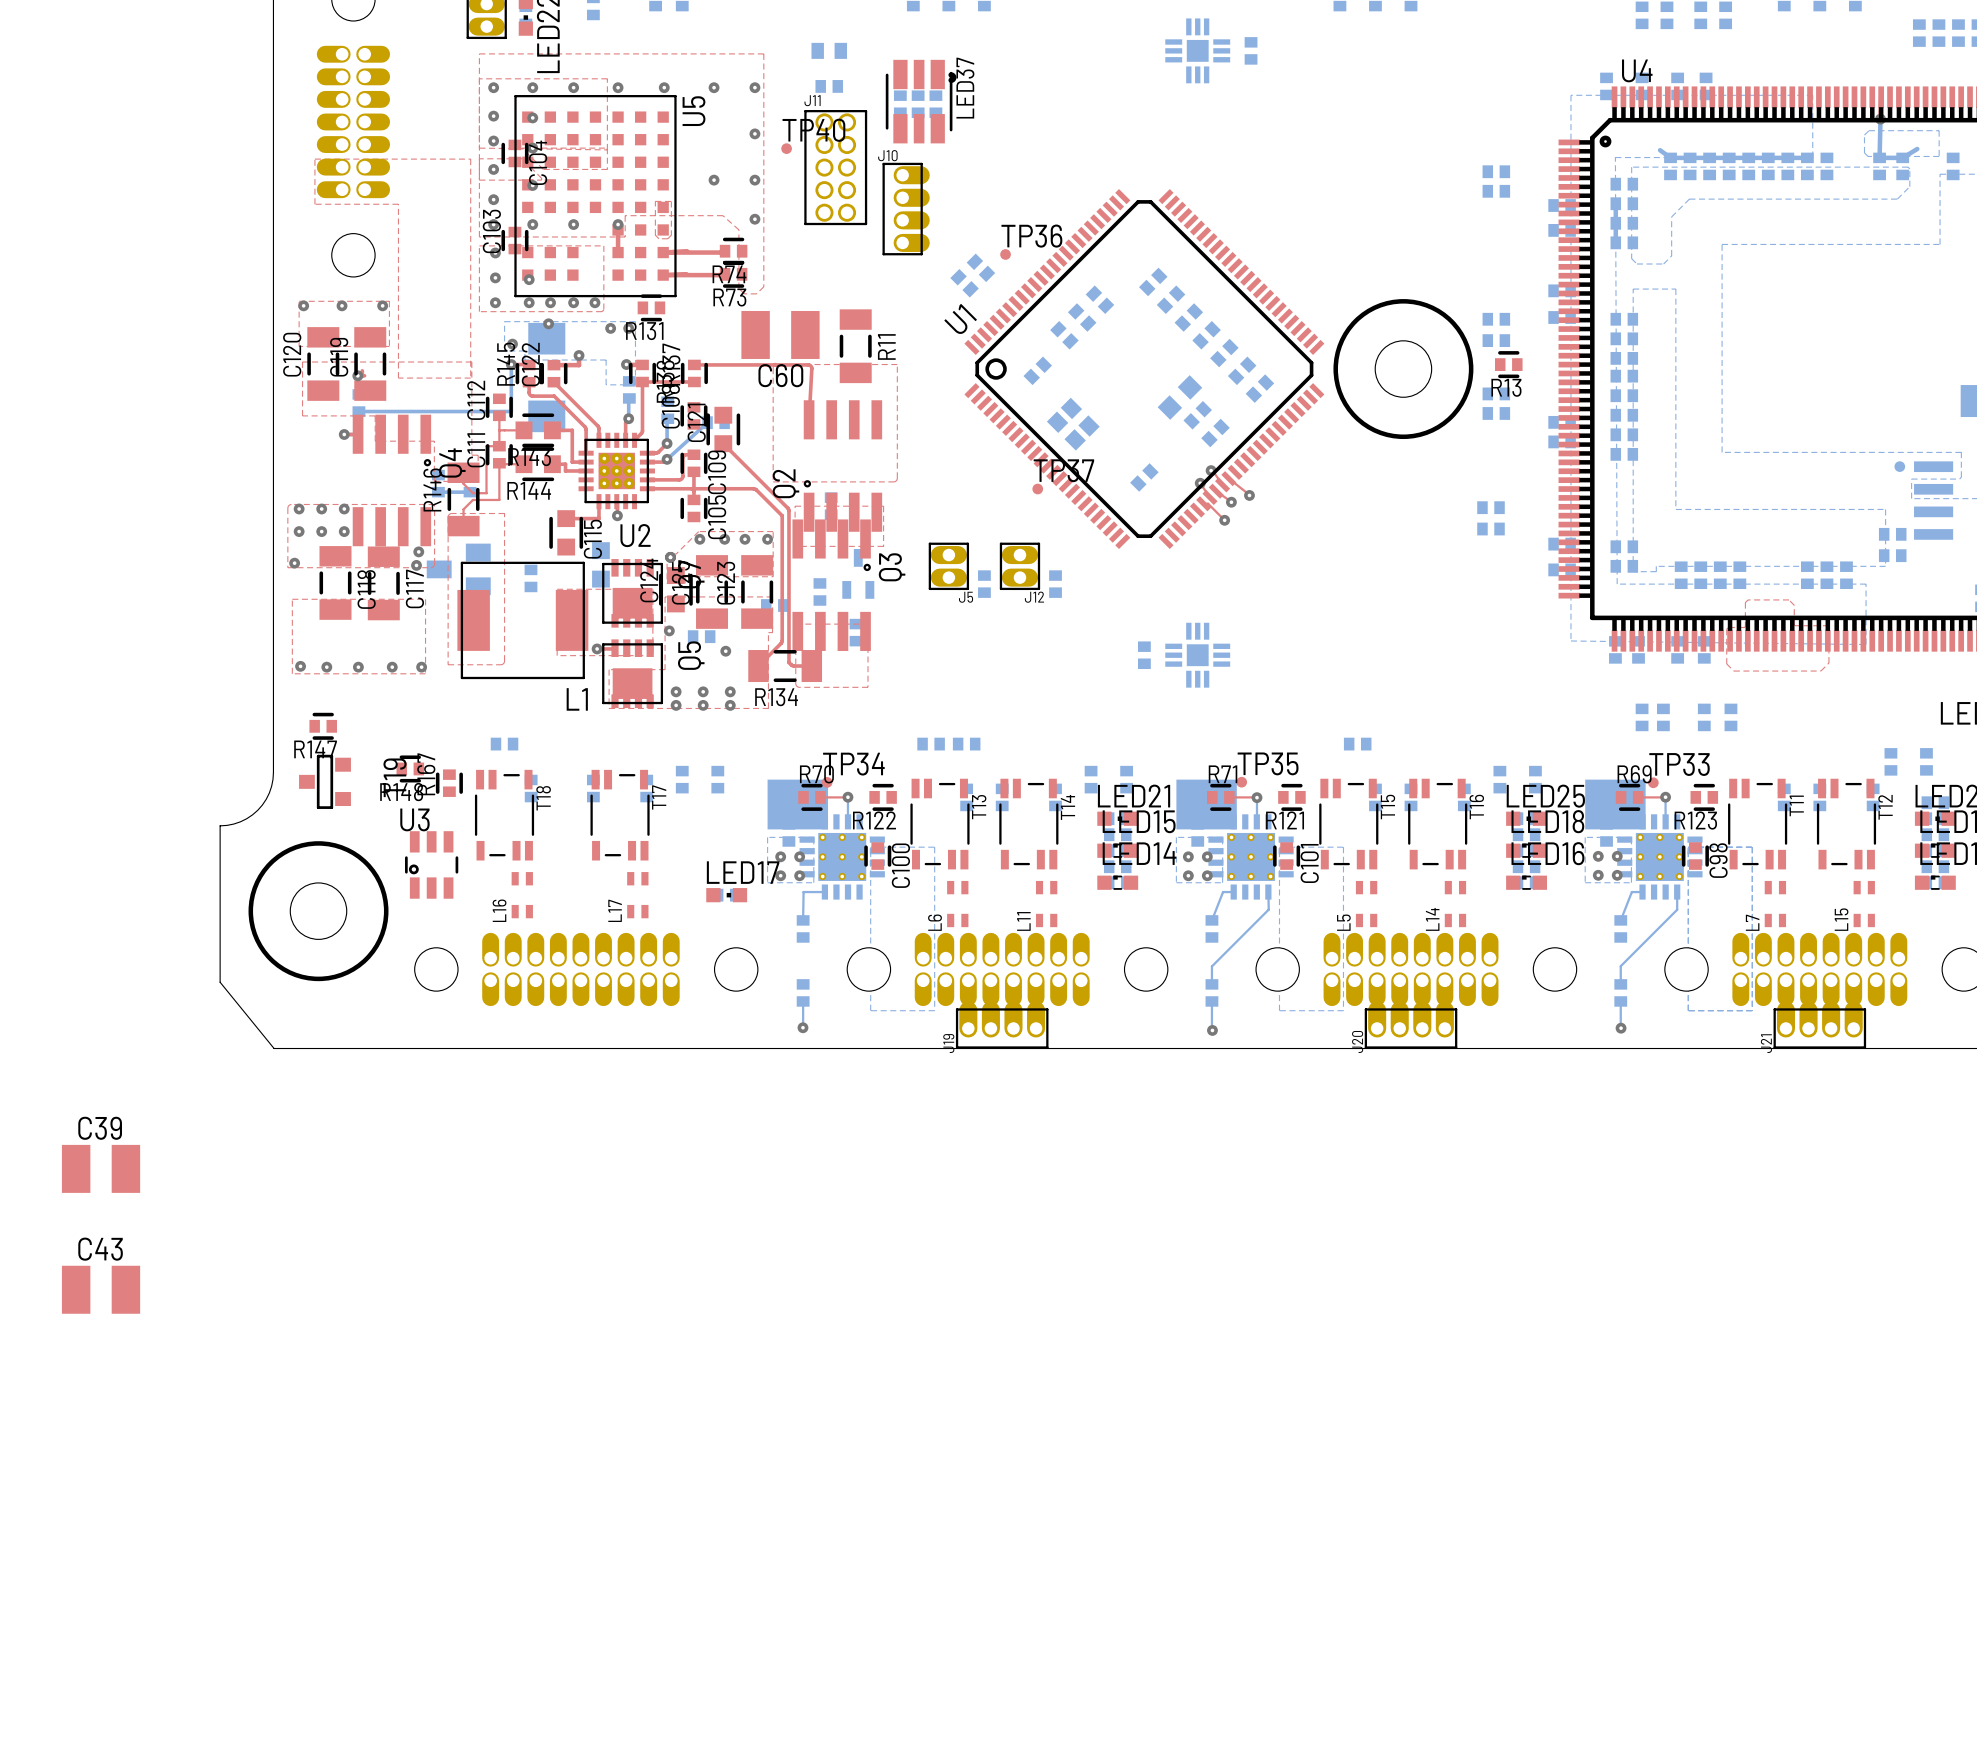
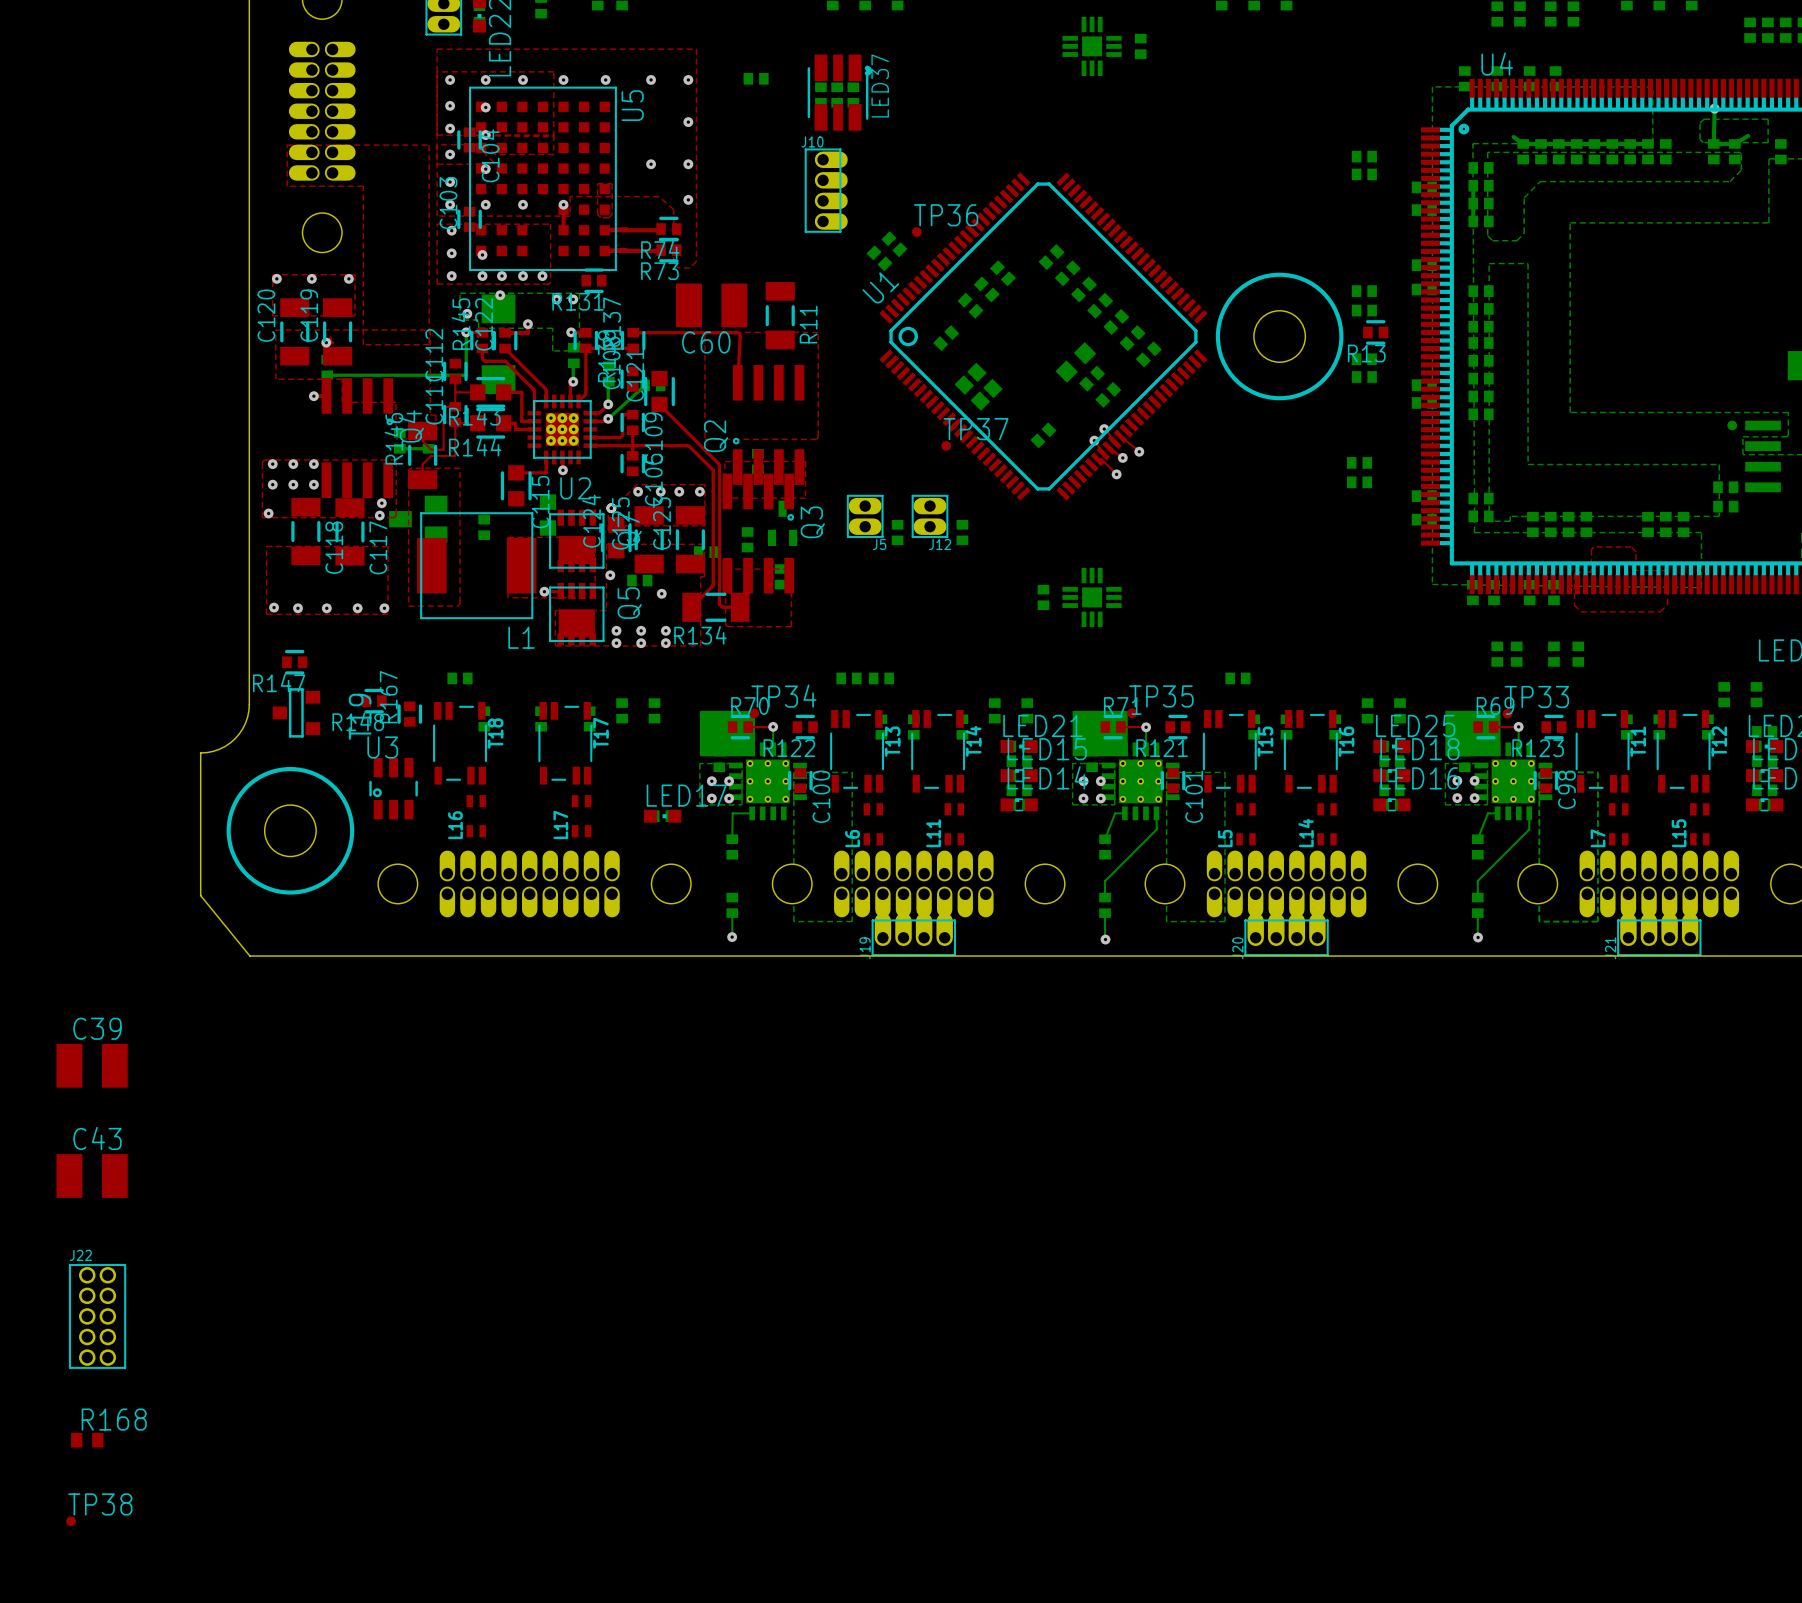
part: (829, 50) -> none
TP40: (786, 148) -> none
J11: (835, 167) -> none
J22: none -> (97, 1316)
R168: none -> (87, 1440)
TP38: none -> (71, 1521)

